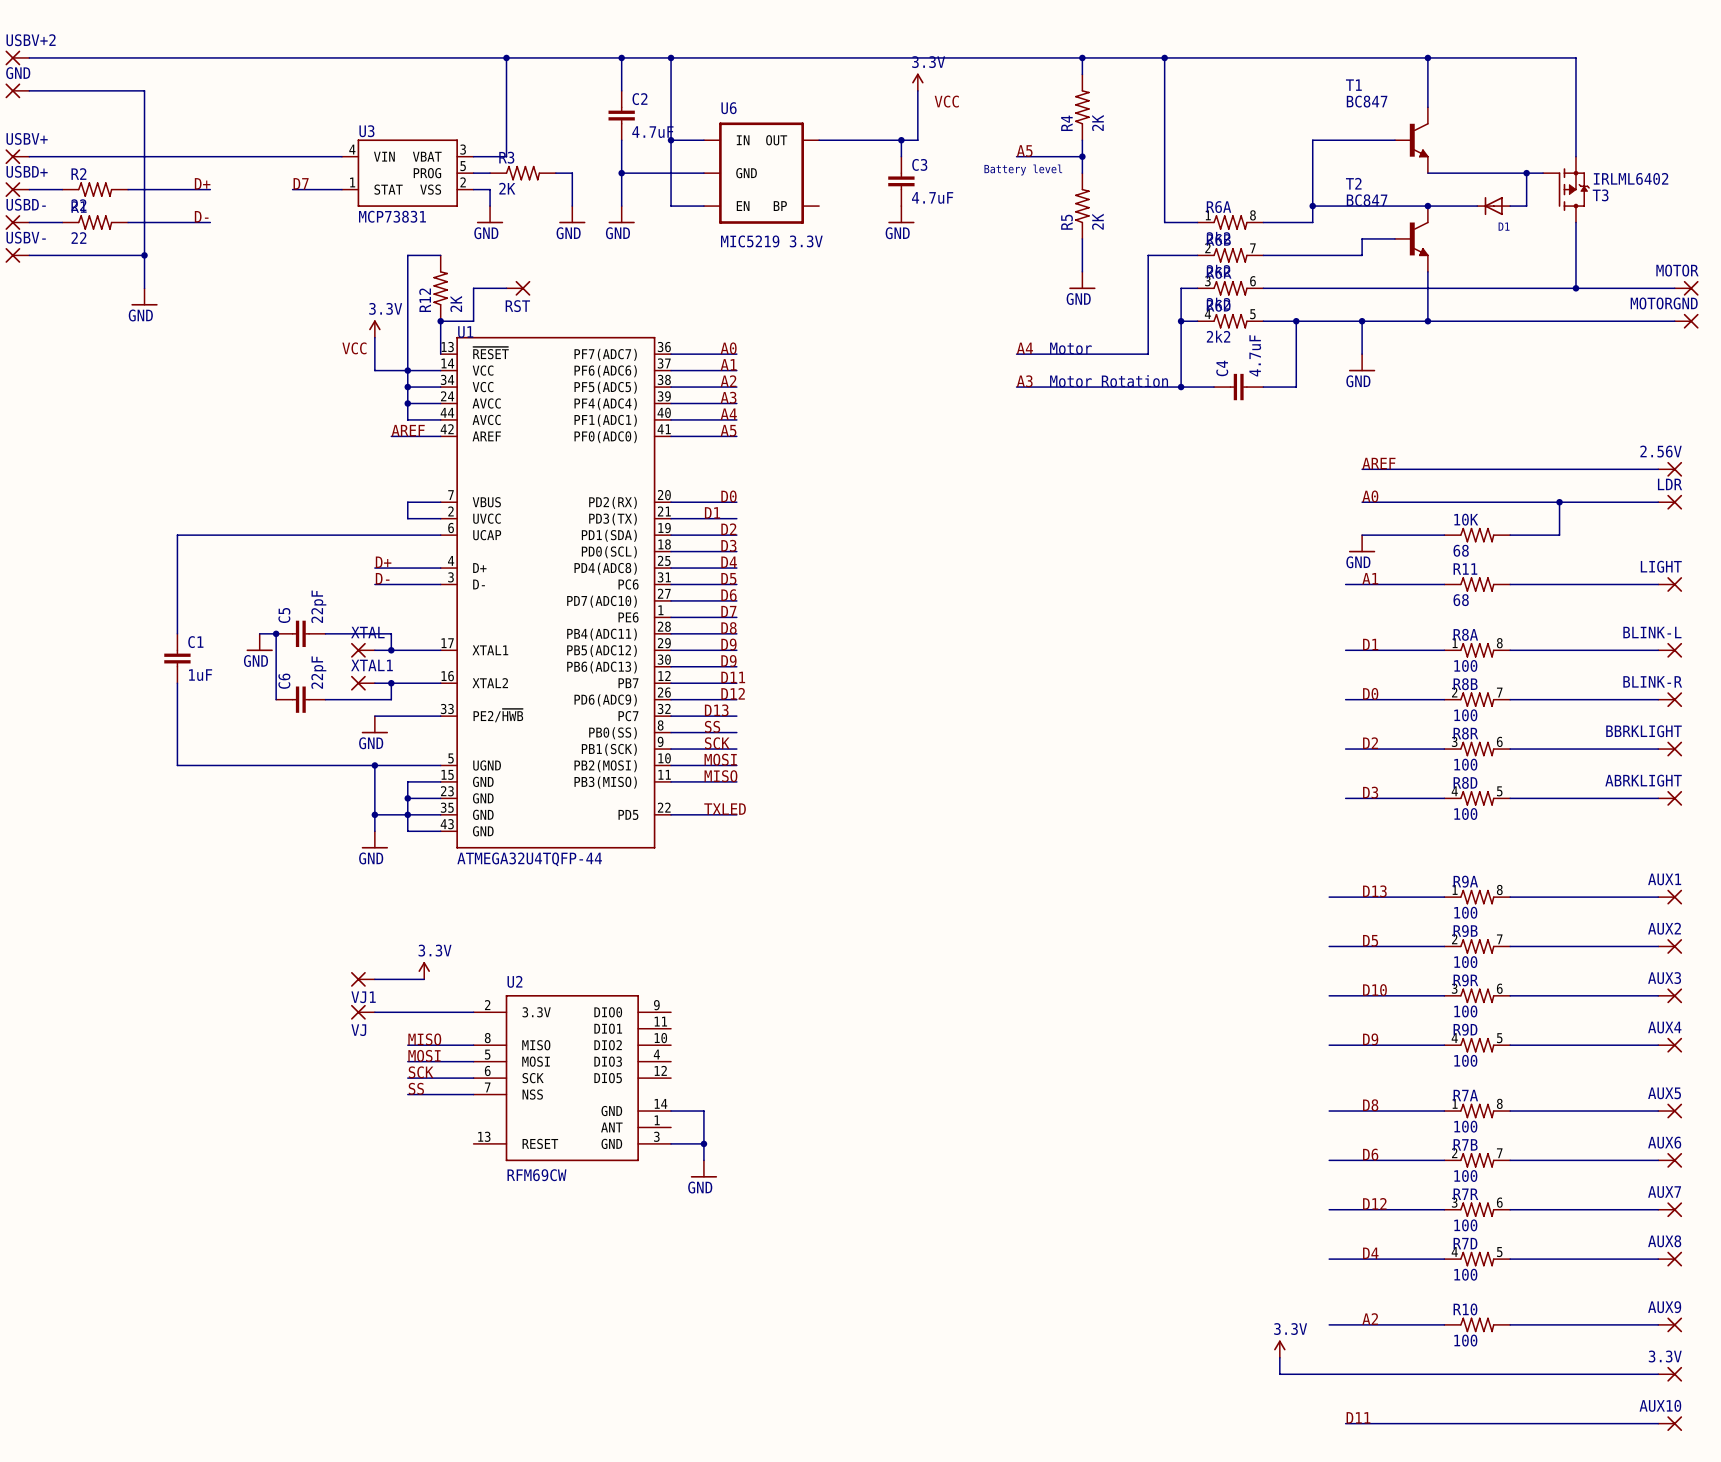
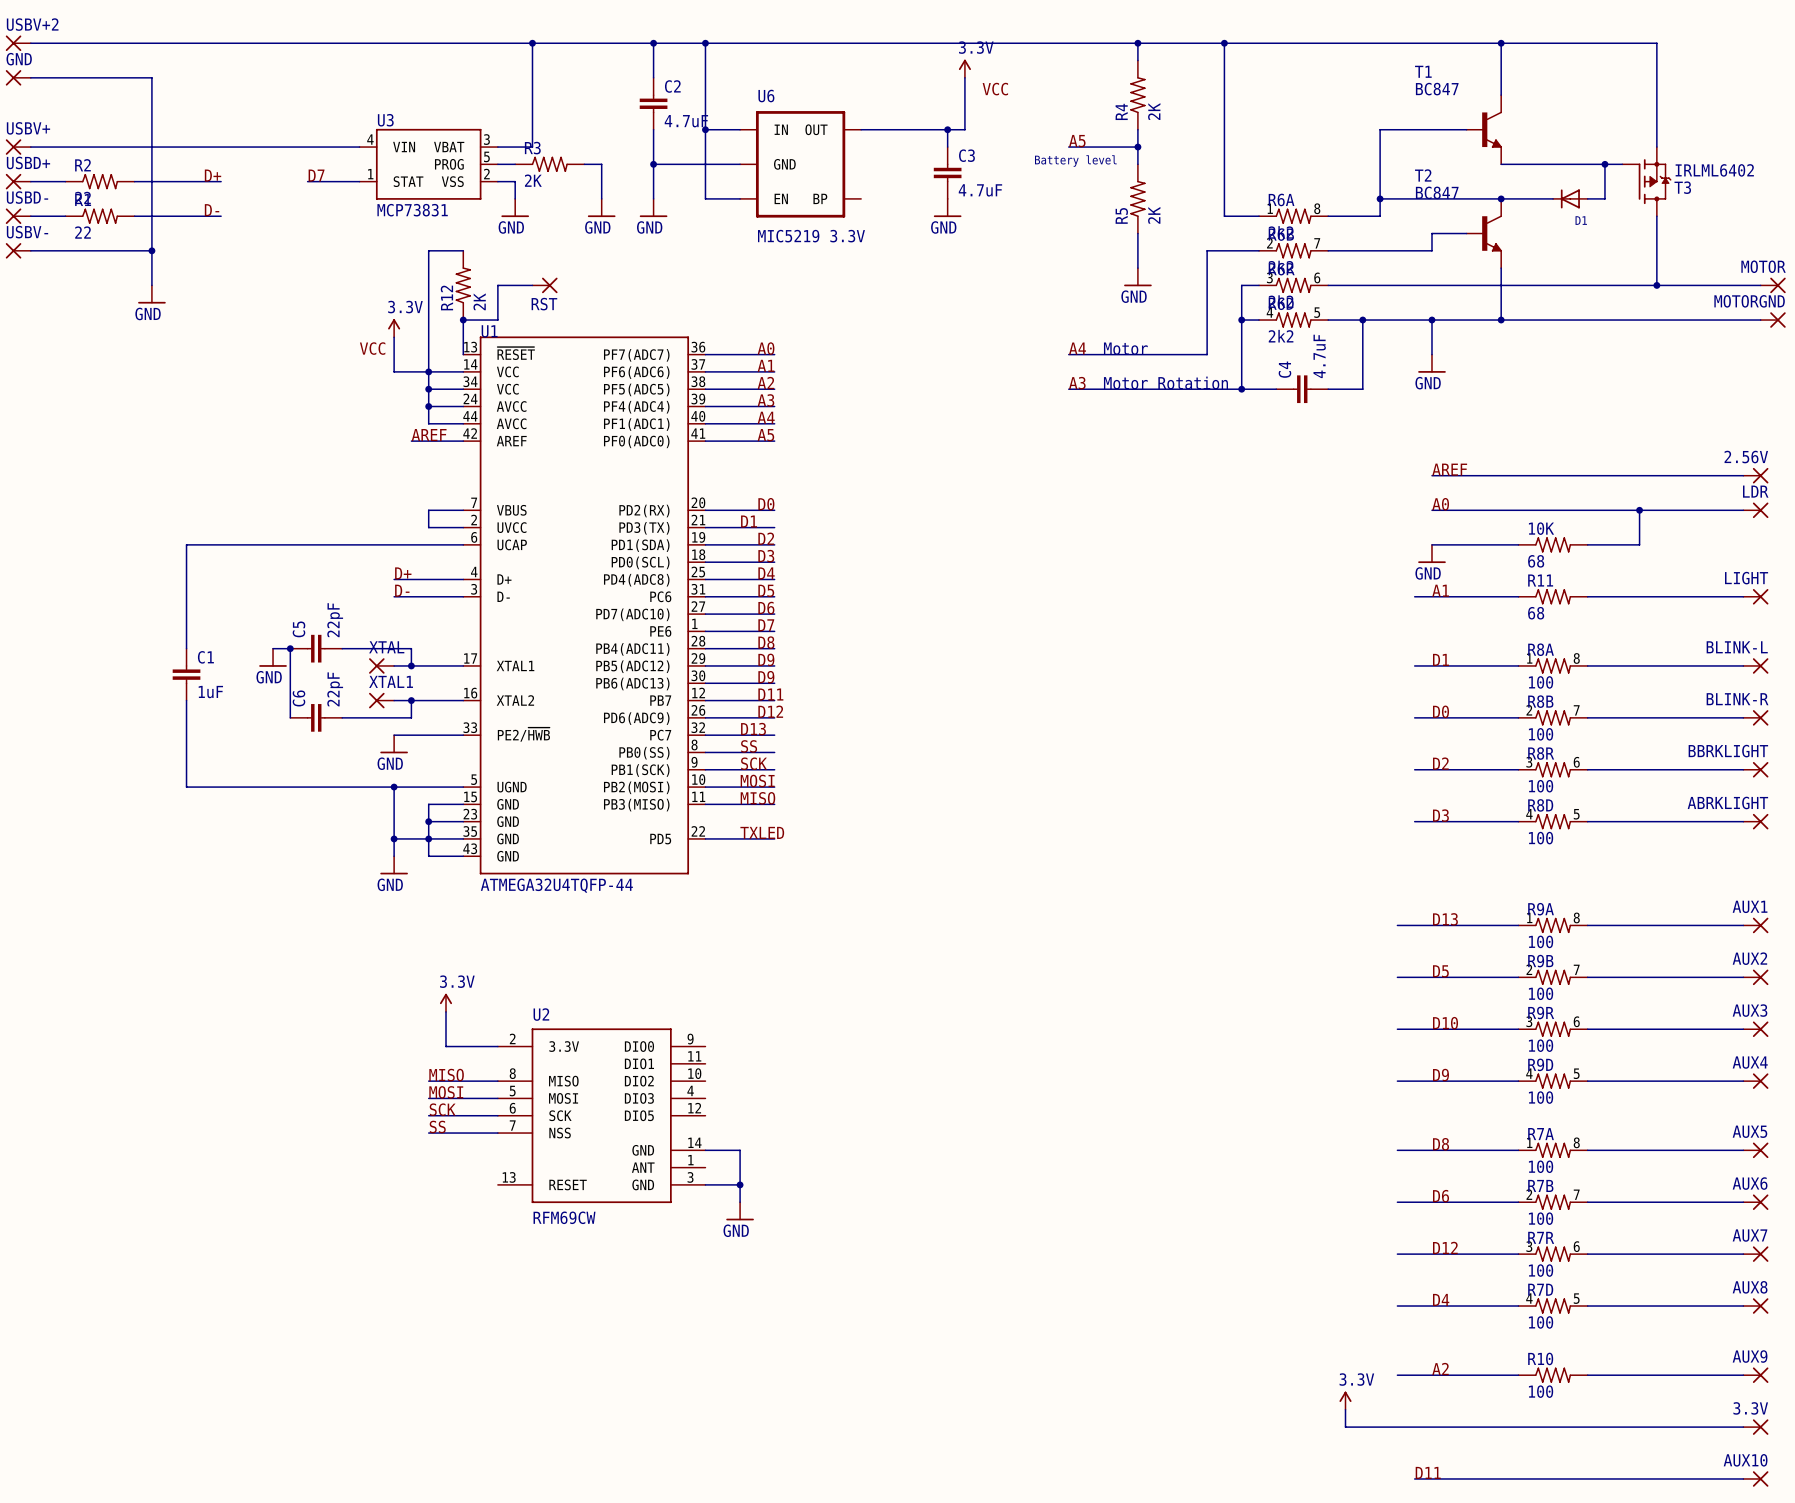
VJ1: (362, 979) -> none
wire: (374, 979) (424, 979) -> (446, 1046) (446, 1011)
VJ: (362, 1012) -> none
wire: (374, 1012) (424, 1012) -> none

